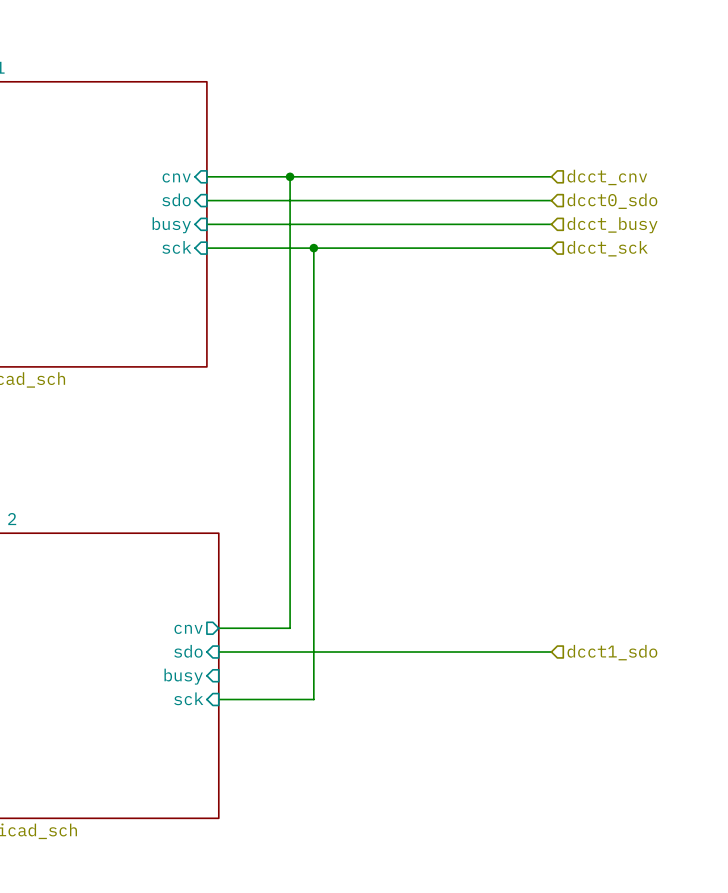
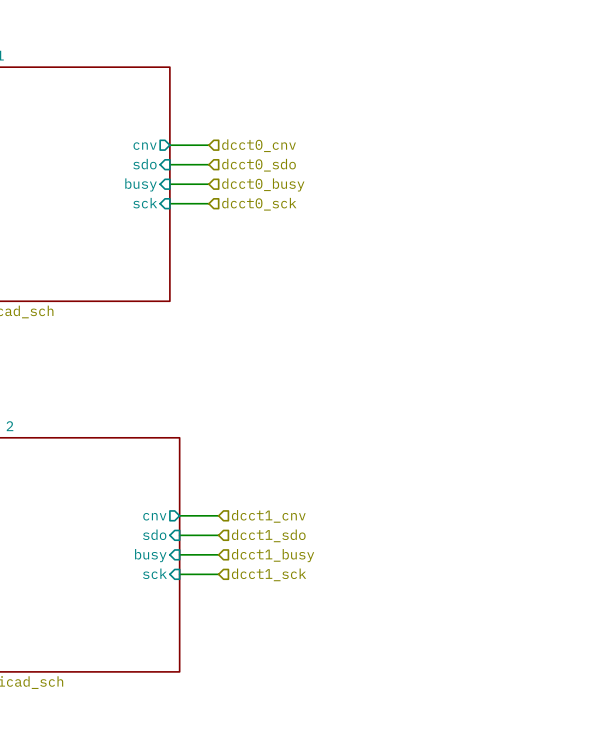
wire: (254, 176) (551, 176) -> none
wire: (290, 176) (290, 628) (266, 628) -> none
junction: (290, 176) -> none
sheet pin shape: input (176, 177) -> output (145, 146)
hierarchical label: none -> dcct0_cnv (259, 145)
hierarchical label: dcct_cnv (607, 177) -> none
wire: (254, 200) (551, 200) -> none
hierarchical label: none -> dcct0_sdo (258, 165)
hierarchical label: dcct0_sdo (612, 201) -> none
wire: (254, 224) (551, 224) -> none
hierarchical label: none -> dcct0_busy (263, 184)
hierarchical label: dcct_busy (612, 225) -> none
wire: (254, 248) (551, 248) -> none
wire: (313, 248) (313, 699) (266, 699) -> none
junction: (313, 248) -> none
hierarchical label: none -> dcct0_sck (259, 204)
hierarchical label: dcct_sck (607, 248) -> none
hierarchical label: none -> dcct1_cnv (268, 516)
wire: (266, 652) (551, 652) -> none
hierarchical label: none -> dcct1_sdo (268, 535)
hierarchical label: dcct1_sdo (612, 652) -> none
wire: none -> (179, 554) (218, 554)
hierarchical label: none -> dcct1_busy (273, 555)
hierarchical label: none -> dcct1_sck (269, 574)

